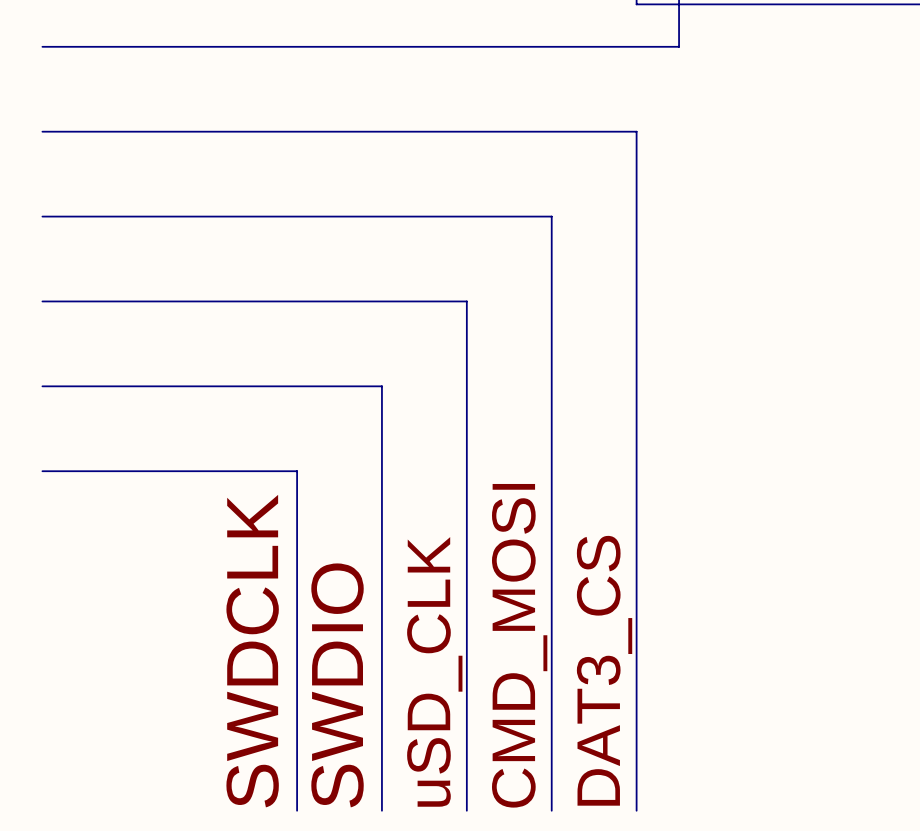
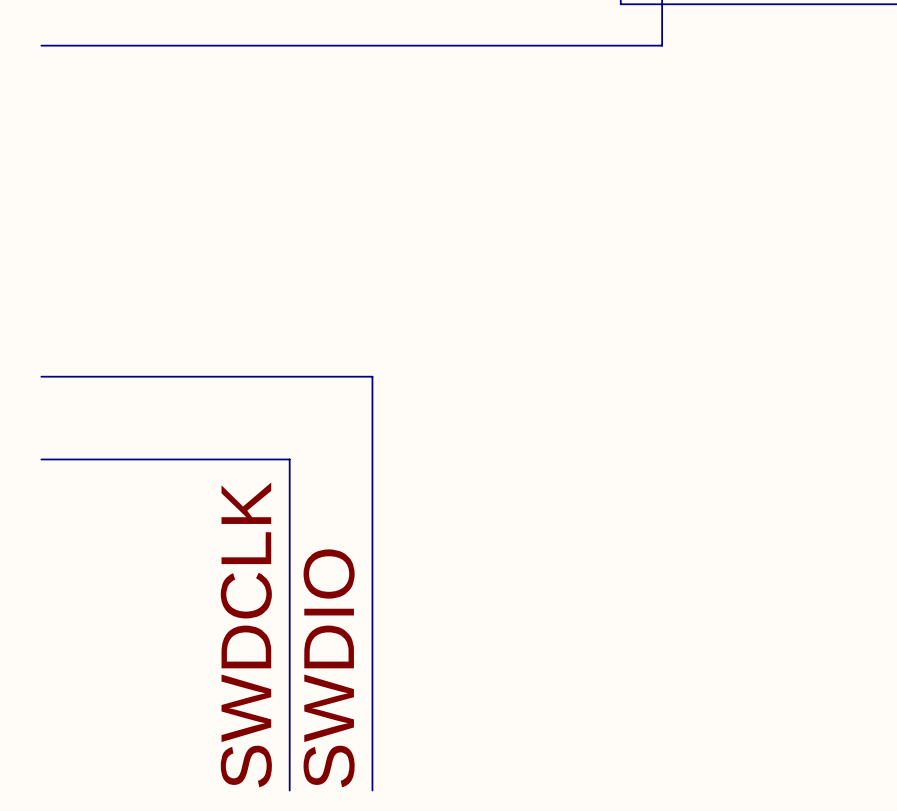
wire: (42, 131) (636, 131) (636, 810) -> none
wire: (42, 216) (551, 216) (551, 810) -> none
wire: (42, 301) (466, 301) (466, 810) -> none
label: CMD_MOSI (519, 645) -> none
label: DAT3_CS (604, 670) -> none
label: uSD_CLK (434, 671) -> none

